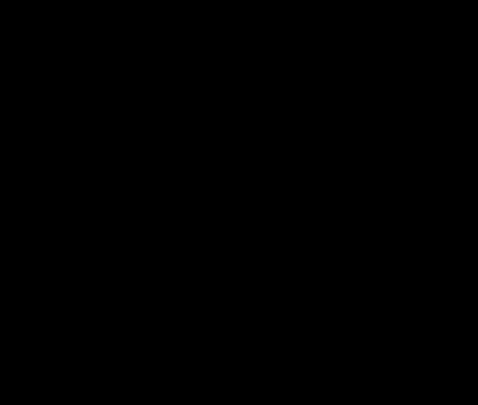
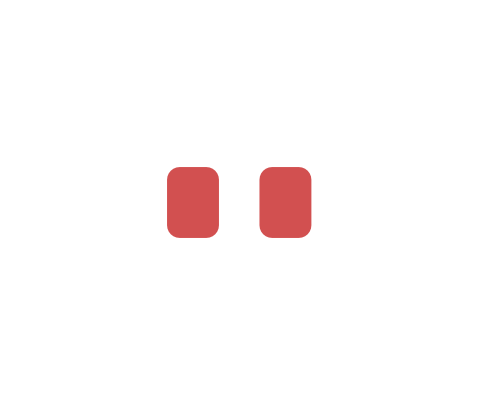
part: none -> (239, 202)

